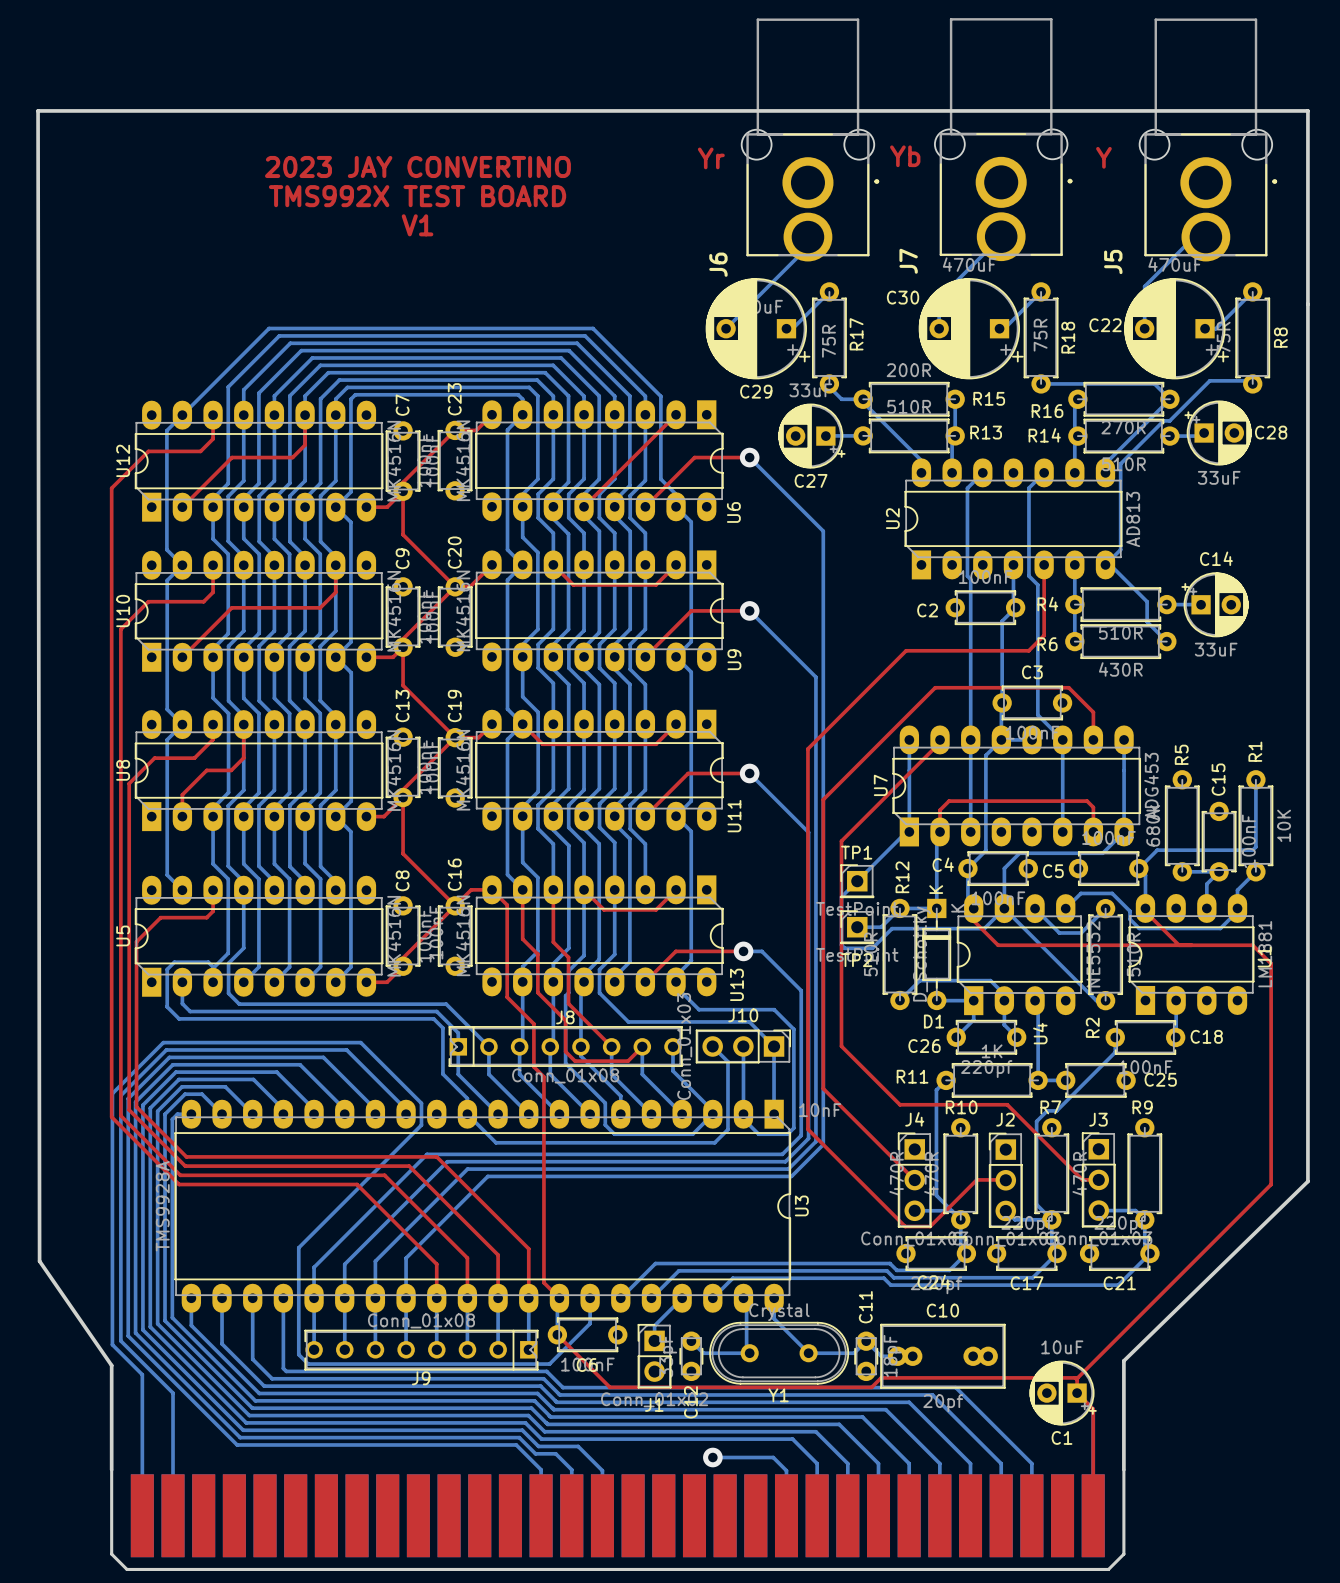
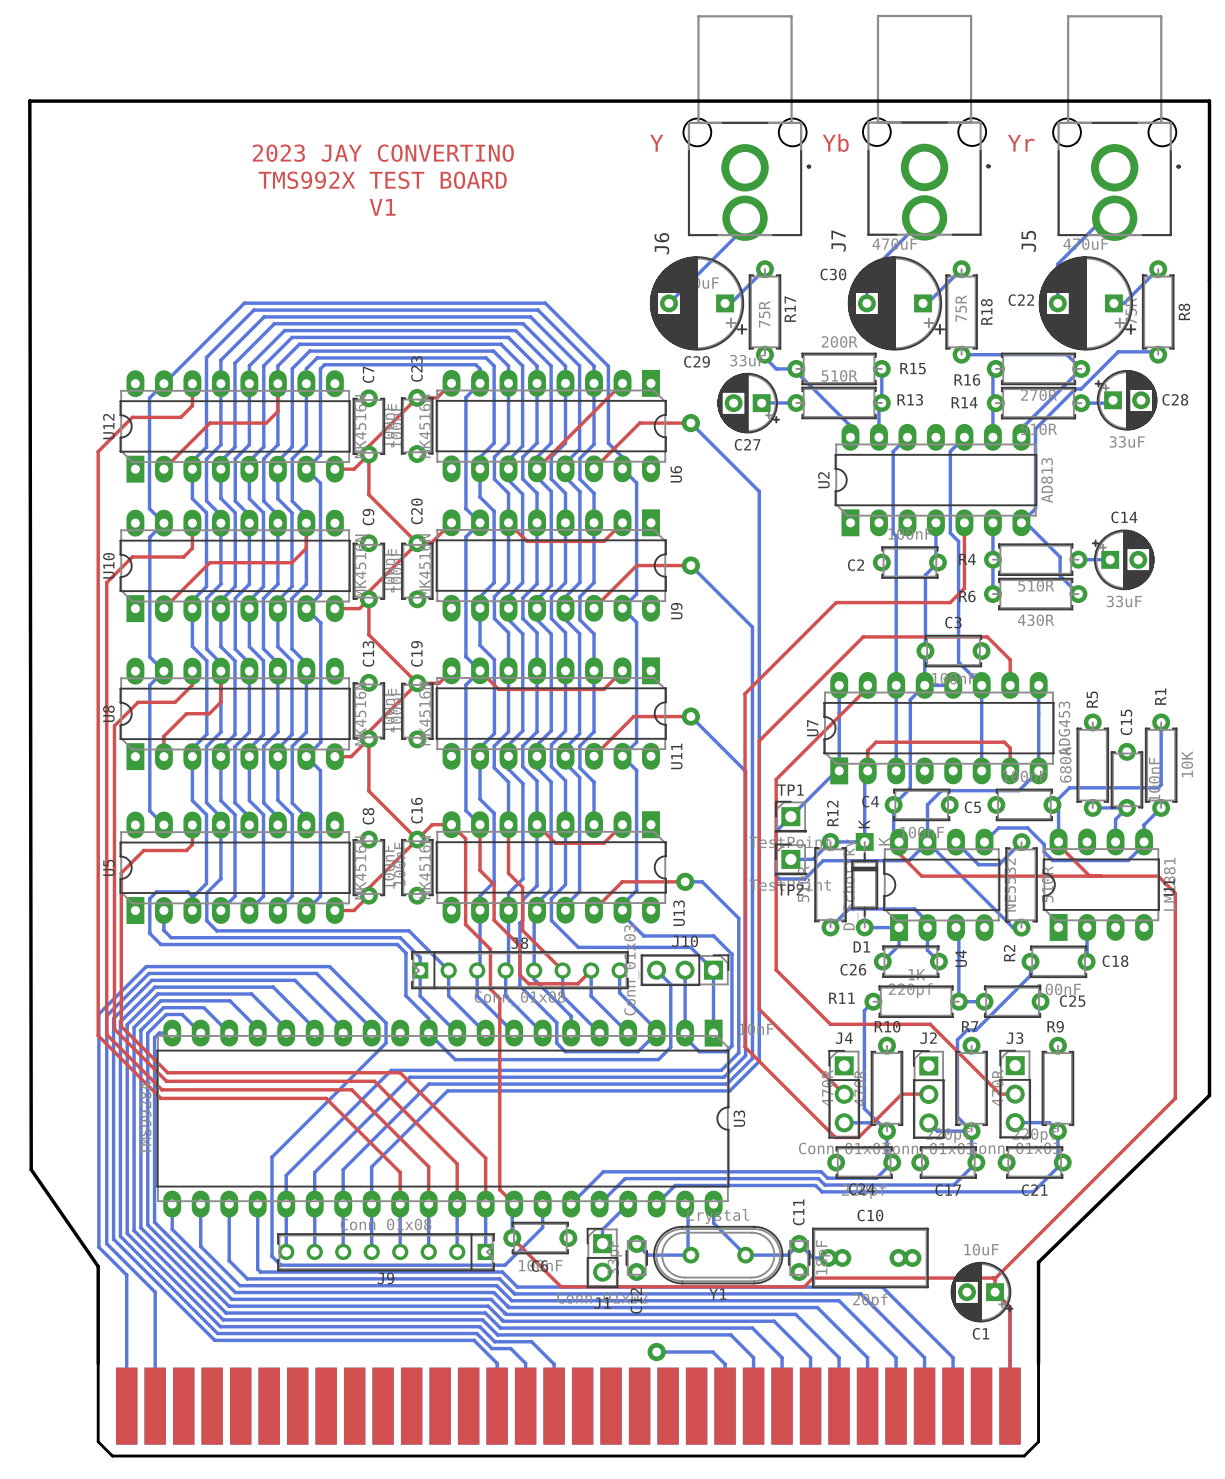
text: Y (1103, 157) -> Yr (1021, 143)
text: Yr (711, 158) -> Y (656, 143)

